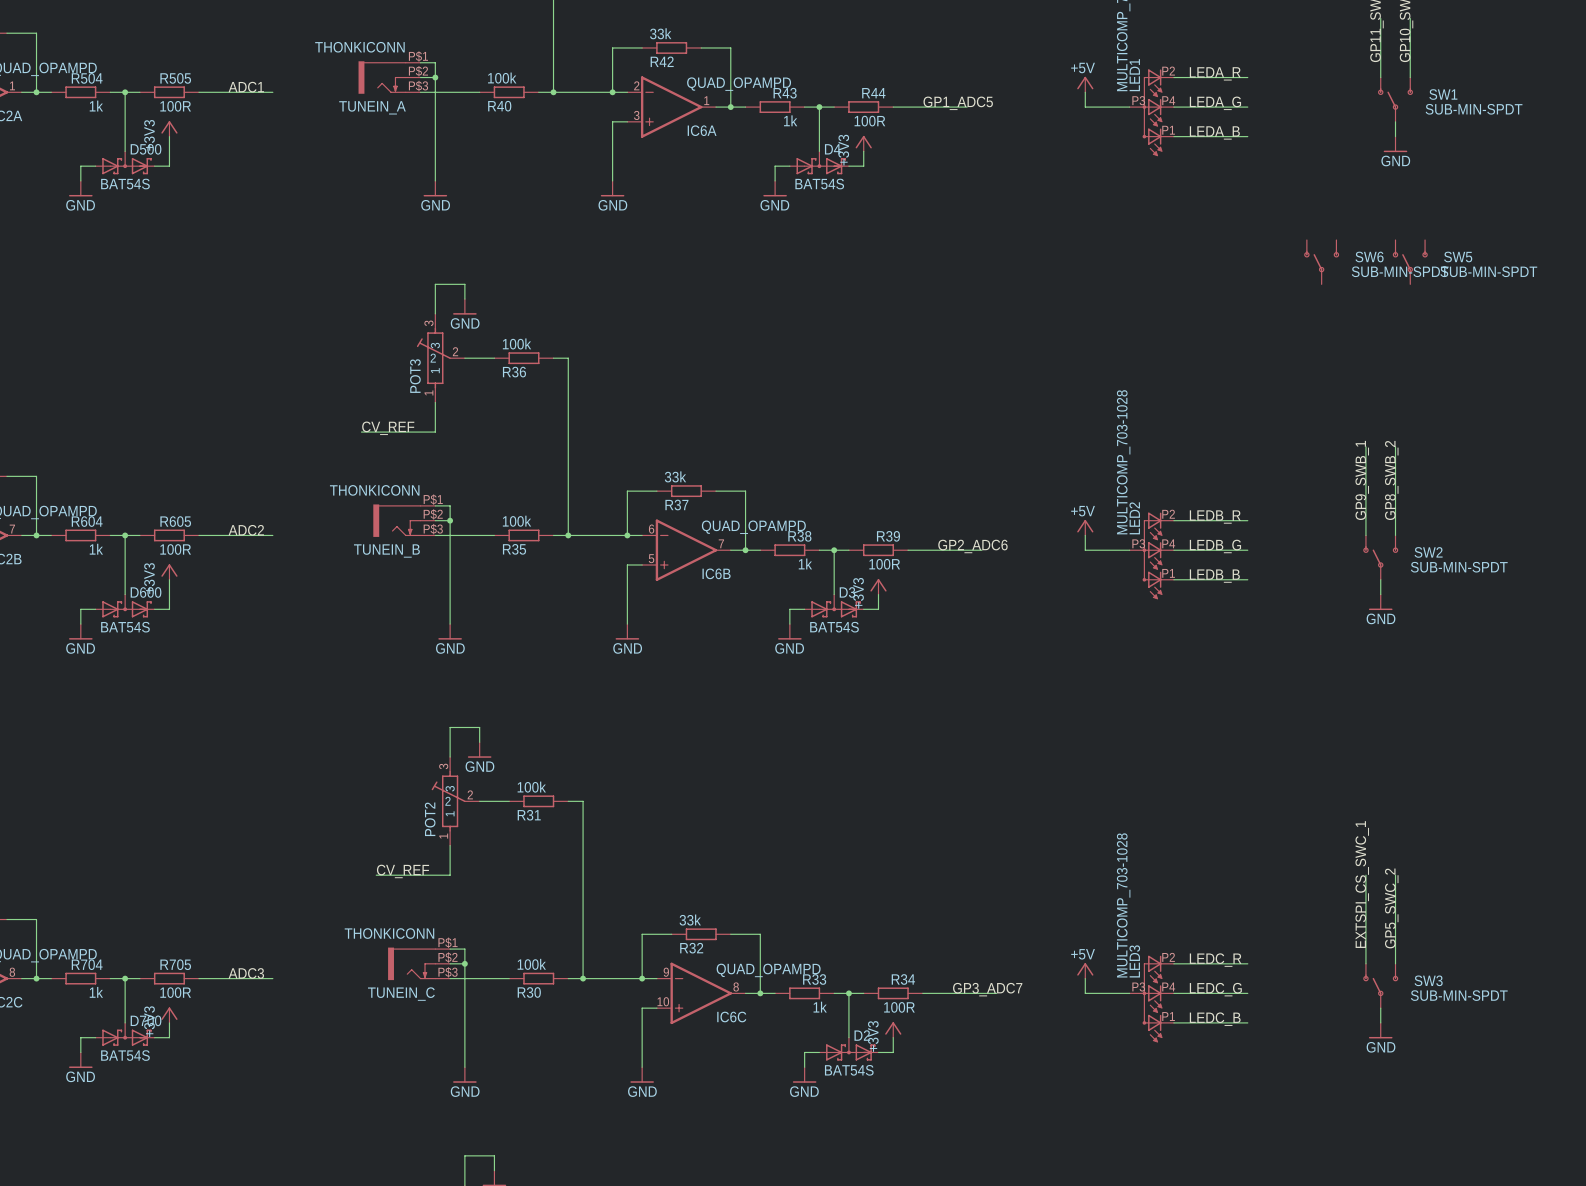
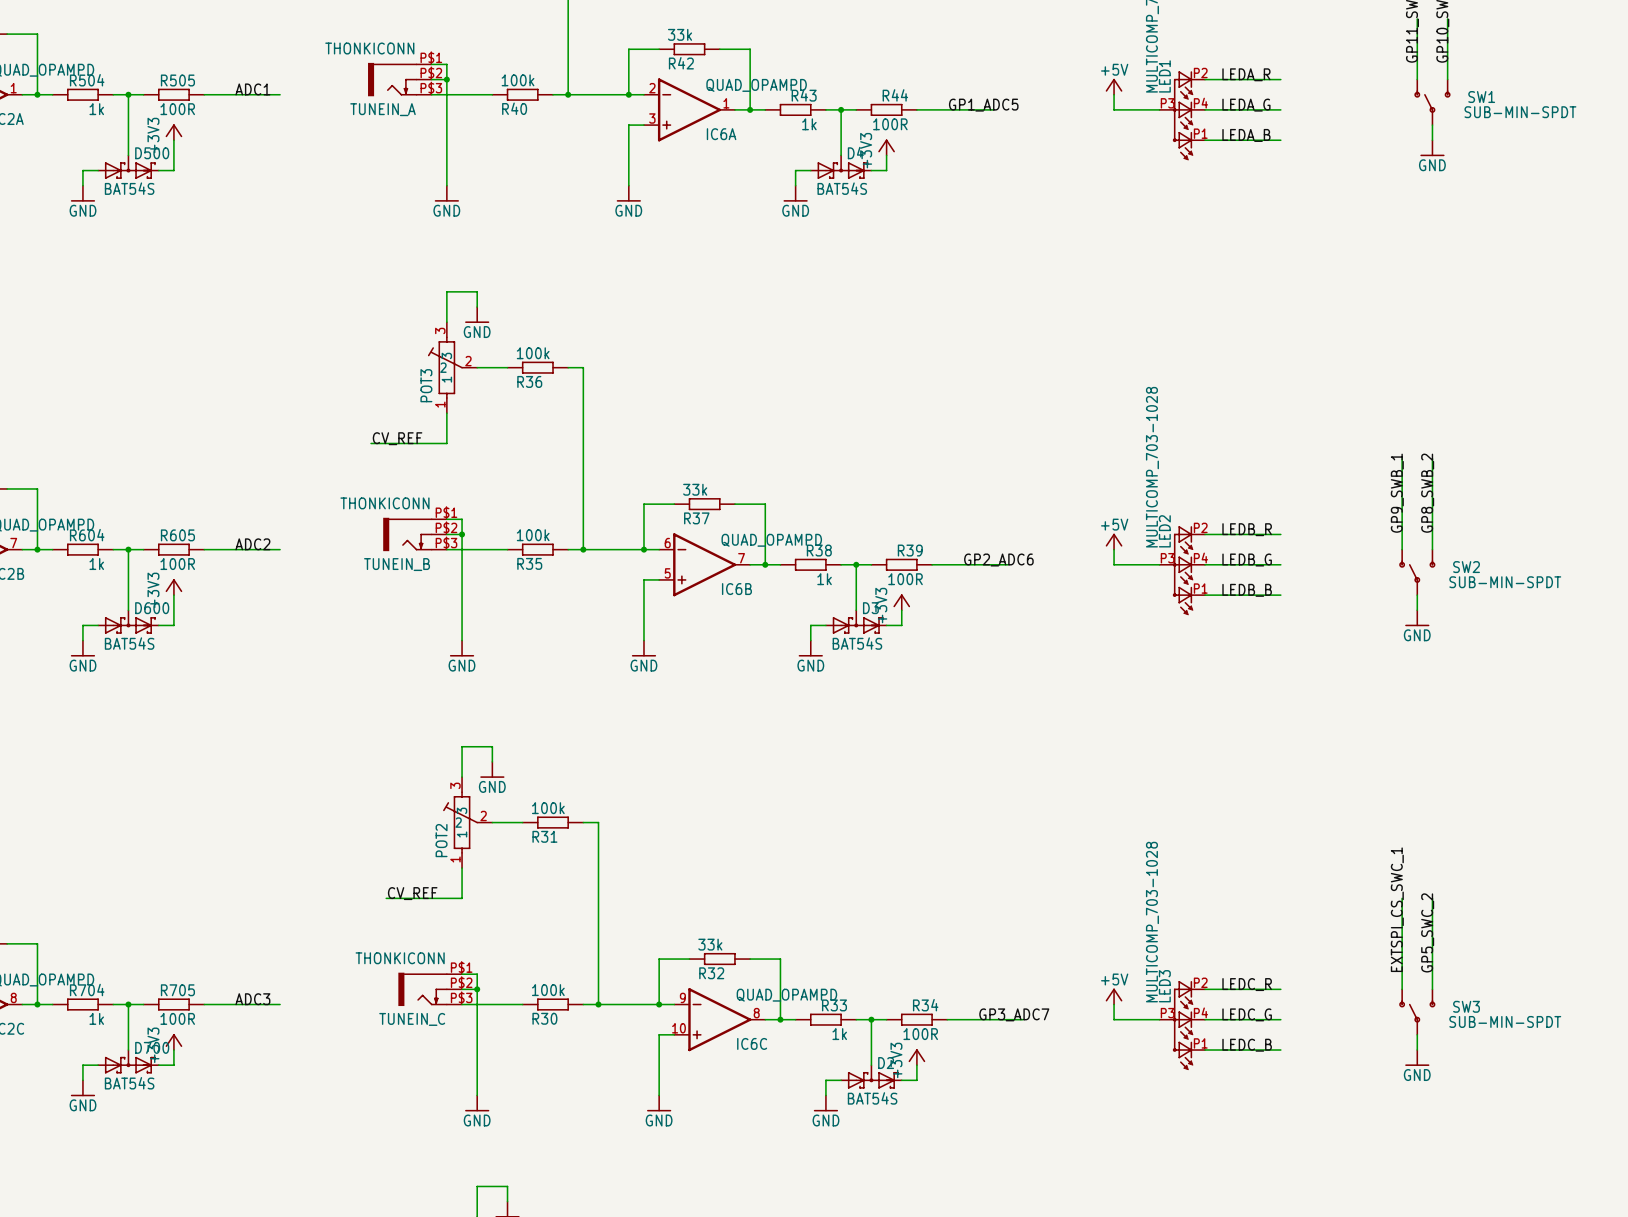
SW6: SUB-MIN-SPDT (1321, 262) -> none
SW5: SUB-MIN-SPDT (1410, 262) -> none

